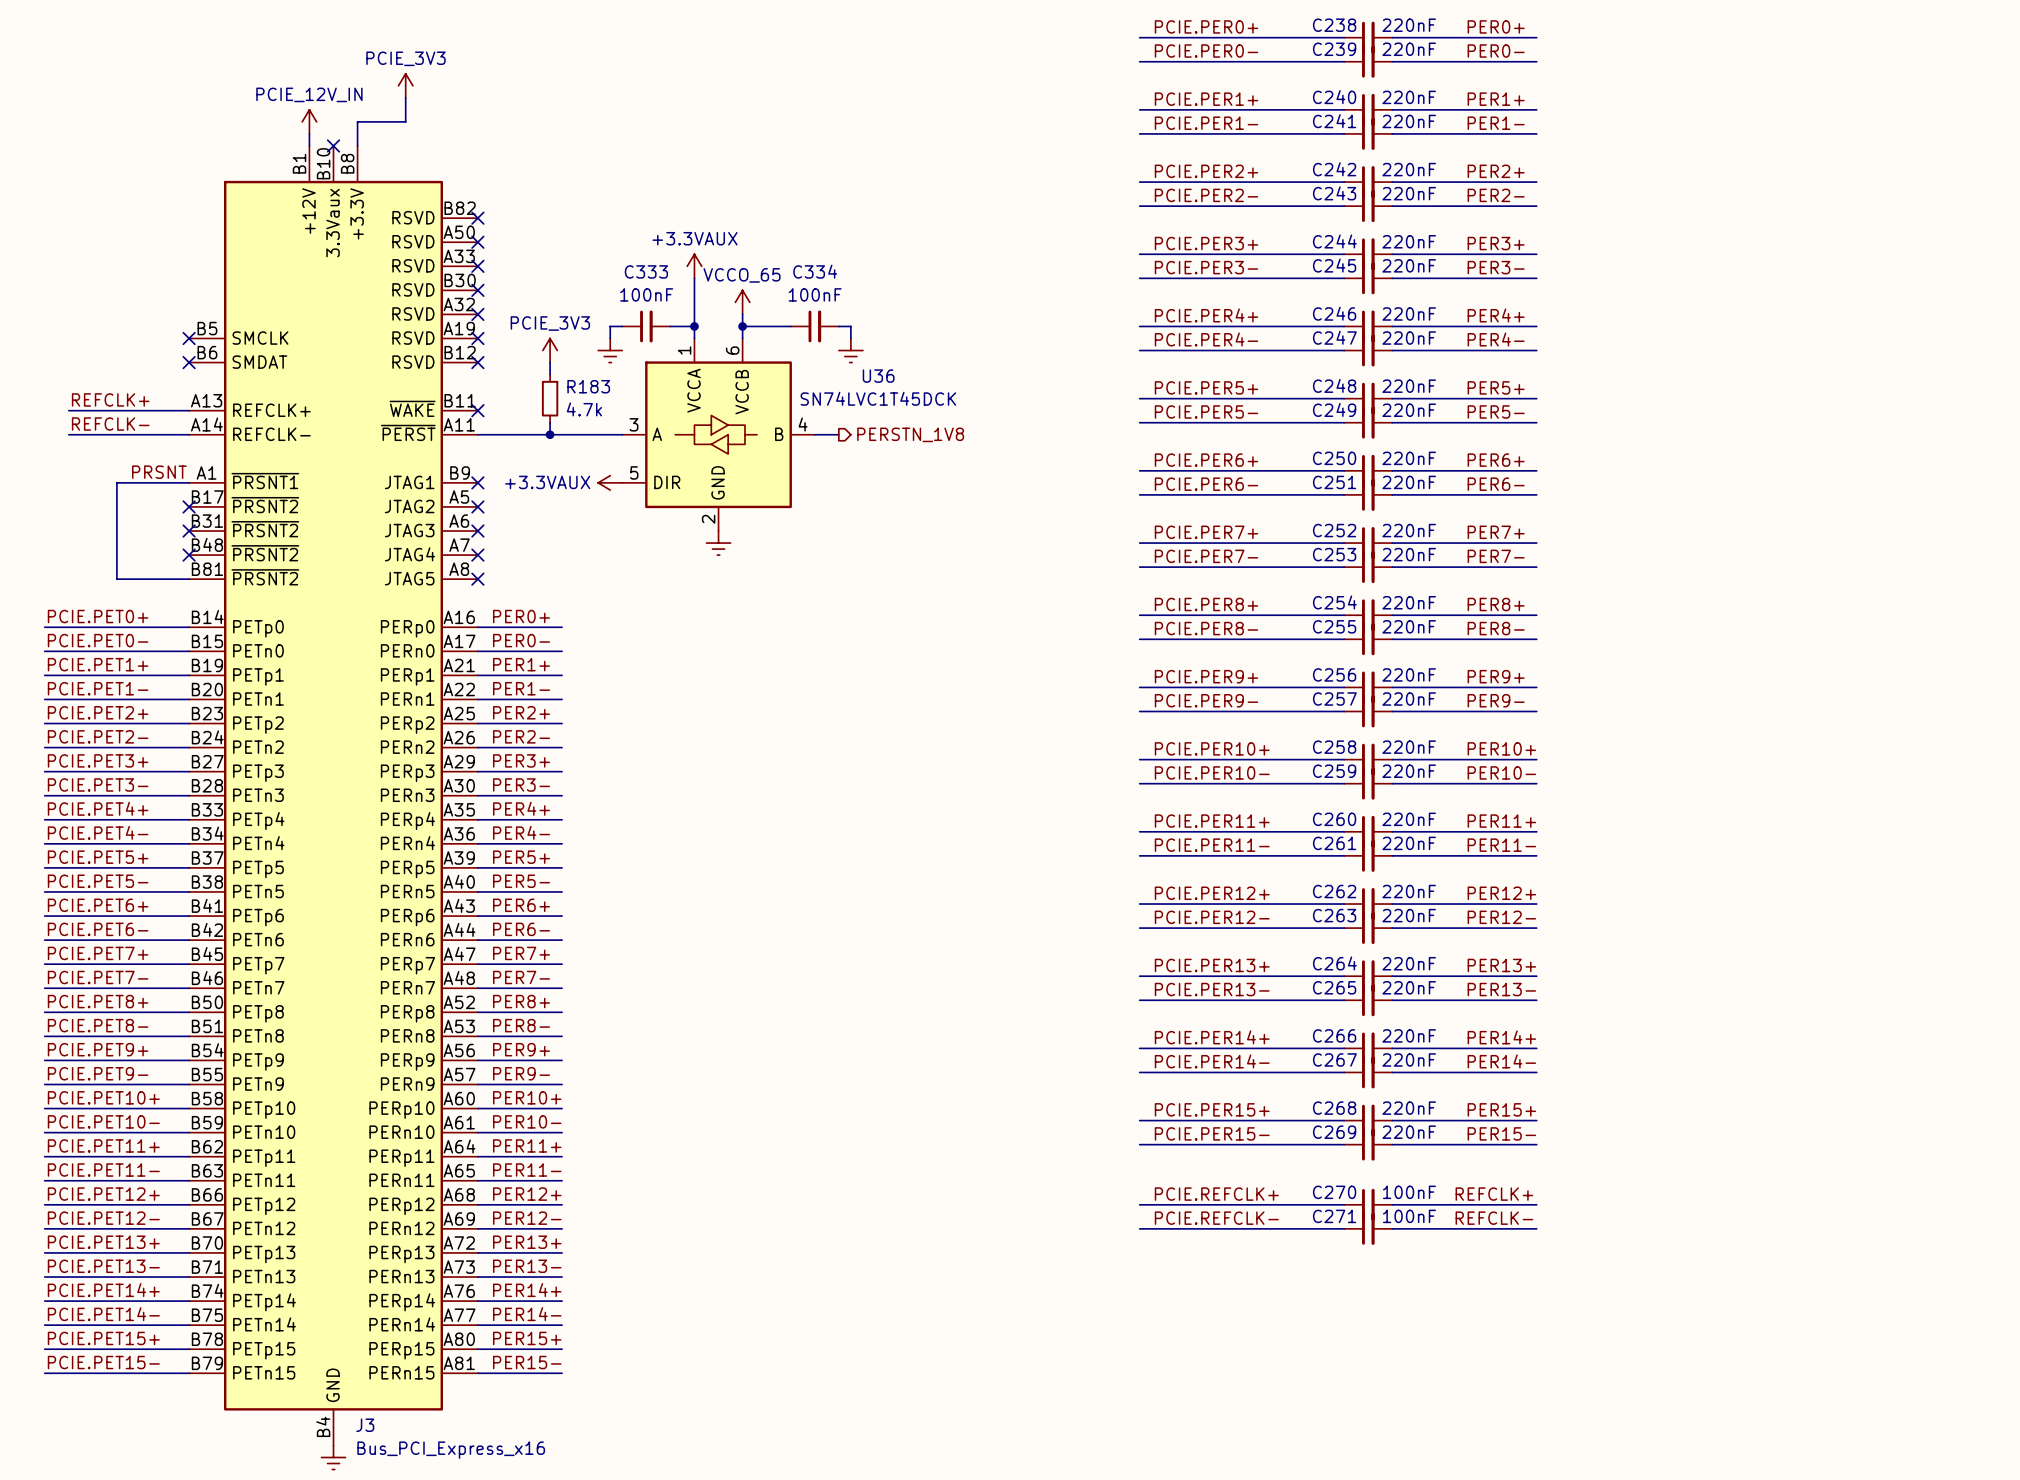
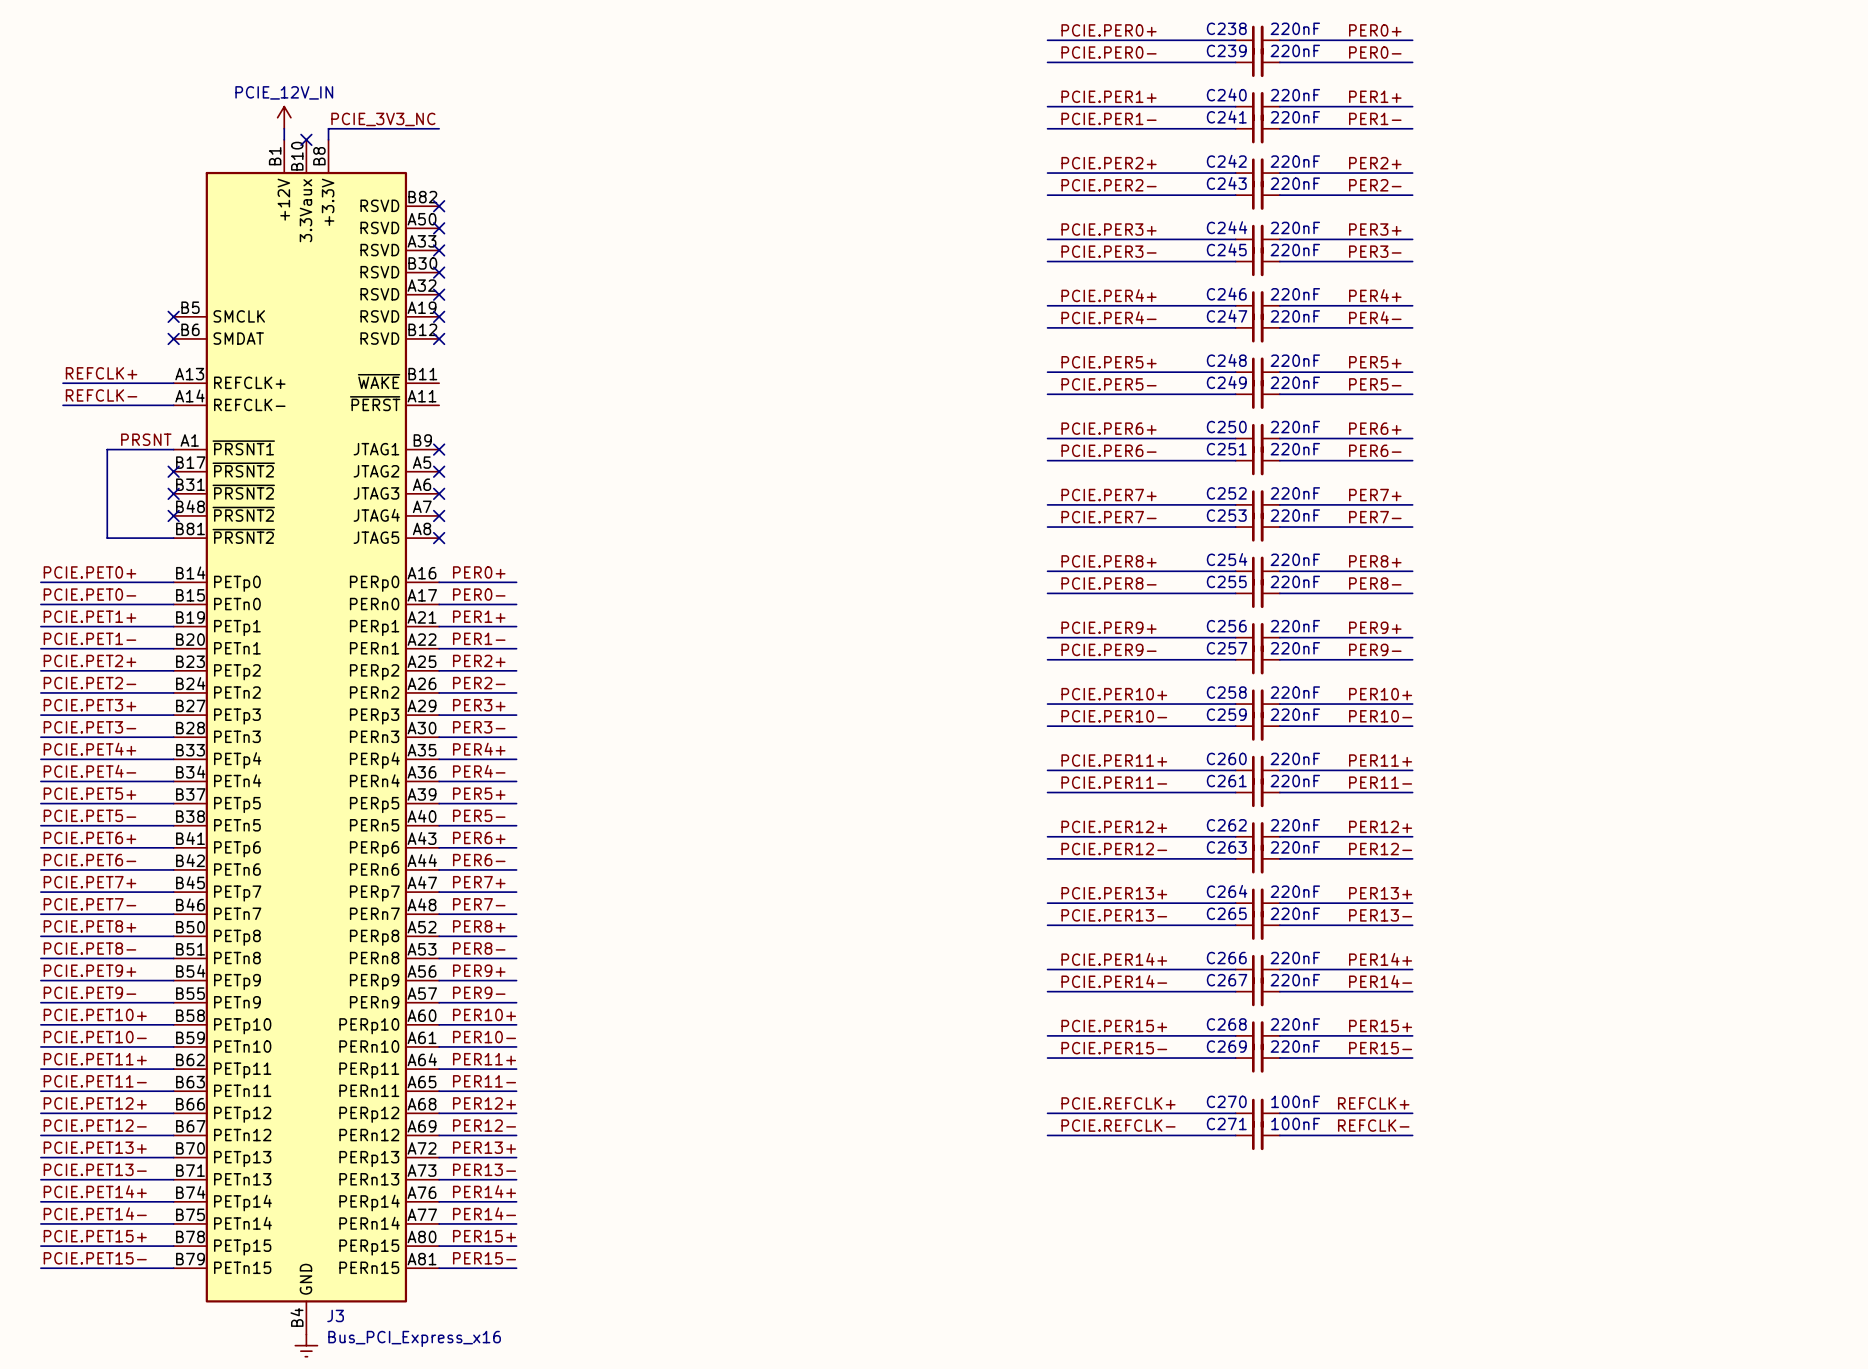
power symbol: PCIE_3V3 (405, 85) -> none
wire: (405, 97) (405, 121) (357, 121) (357, 133) -> (439, 128) (328, 128)
label: none -> PCIE_3V3_NC (383, 119)
power symbol: +3.3VAUX (694, 266) -> none
wire: (694, 278) (694, 338) -> none
power symbol: VCCO_65 (742, 302) -> none
wire: (742, 314) (742, 338) -> none
wire: (622, 326) (610, 326) (610, 338) -> none
C333: 100nF (646, 326) -> none
wire: (670, 326) (694, 326) -> none
junction: (694, 326) -> none
wire: (742, 326) (790, 326) -> none
junction: (742, 326) -> none
C334: 100nF (814, 326) -> none
wire: (838, 326) (850, 326) (850, 338) -> none
power symbol: PCIE_3V3 (550, 350) -> none
power symbol: (610, 350) -> none
power symbol: (850, 350) -> none
wire: (550, 362) (550, 374) -> none
R183: 4.7k (550, 398) -> none
no-connect mark: (477, 410) -> none
wire: (550, 422) (550, 434) -> none
wire: (477, 434) (622, 434) -> none
junction: (550, 434) -> none
U36: SN74LVC1T45DCK (718, 434) -> none
wire: (814, 434) (838, 434) -> none
hierarchical label: PERSTN_1V8 (910, 434) -> none
power symbol: +3.3VAUX (610, 482) -> none
power symbol: (718, 543) -> none

